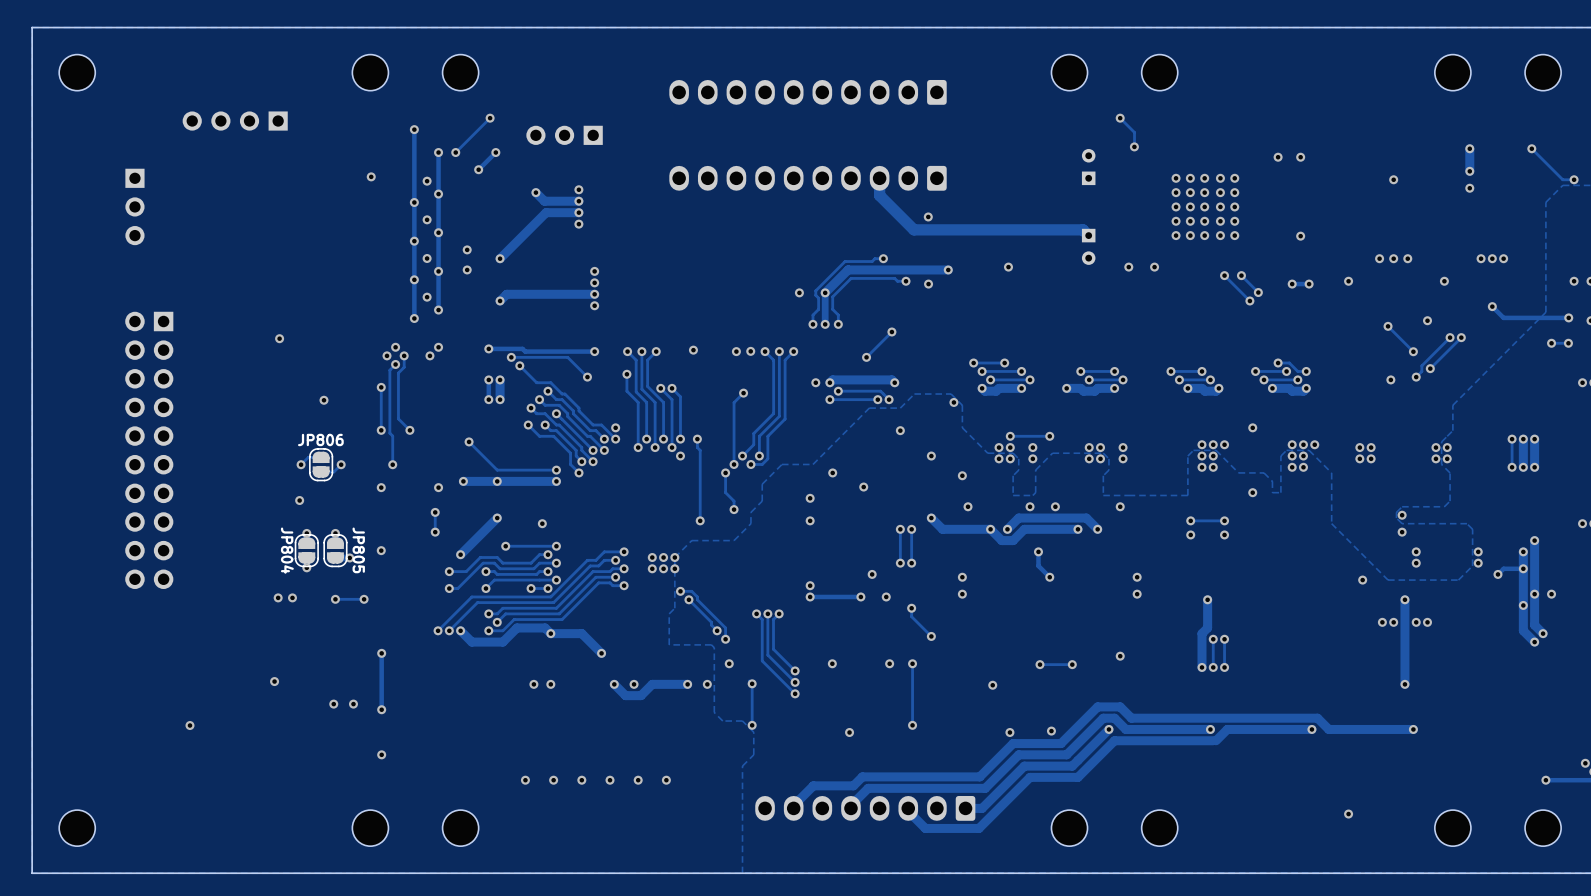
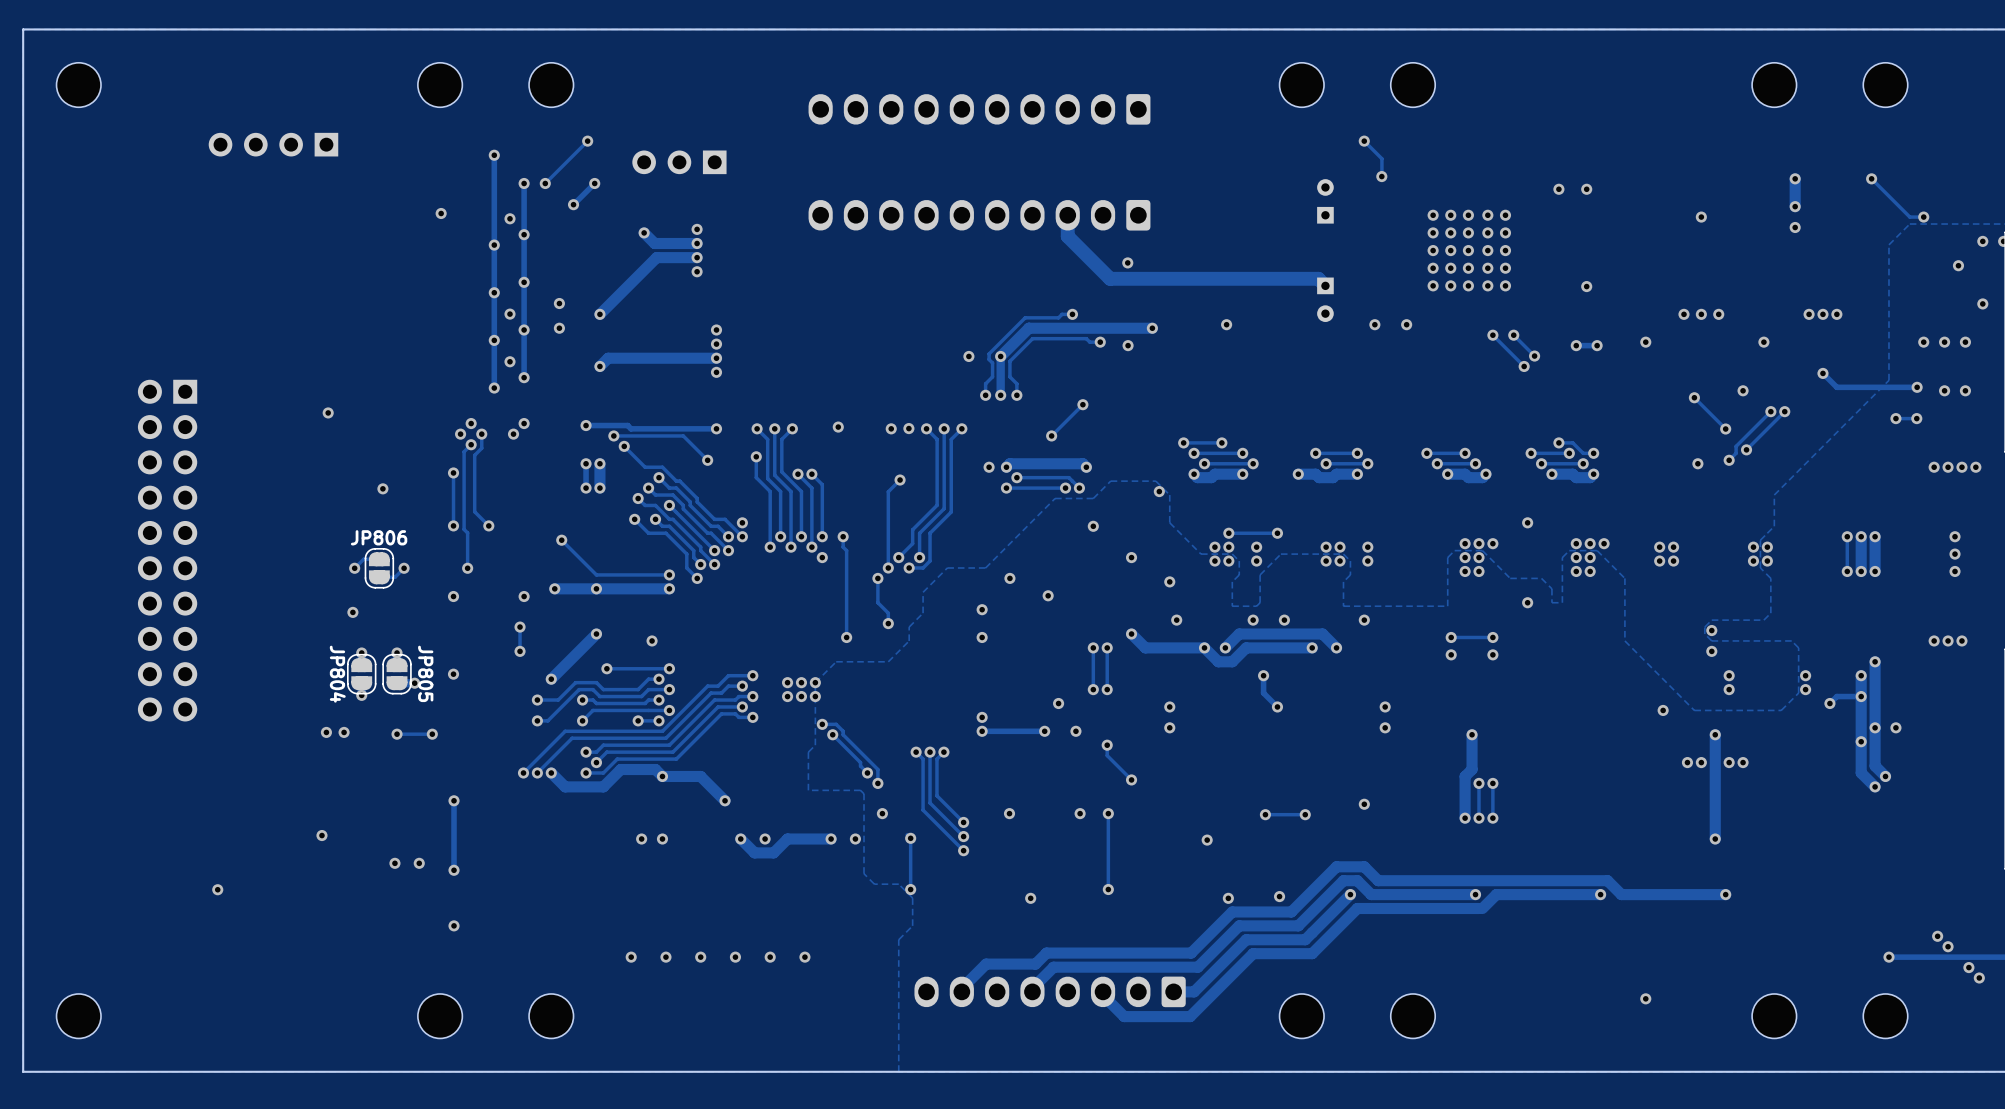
part: (134, 206) -> none
via: (427, 219) -> none

